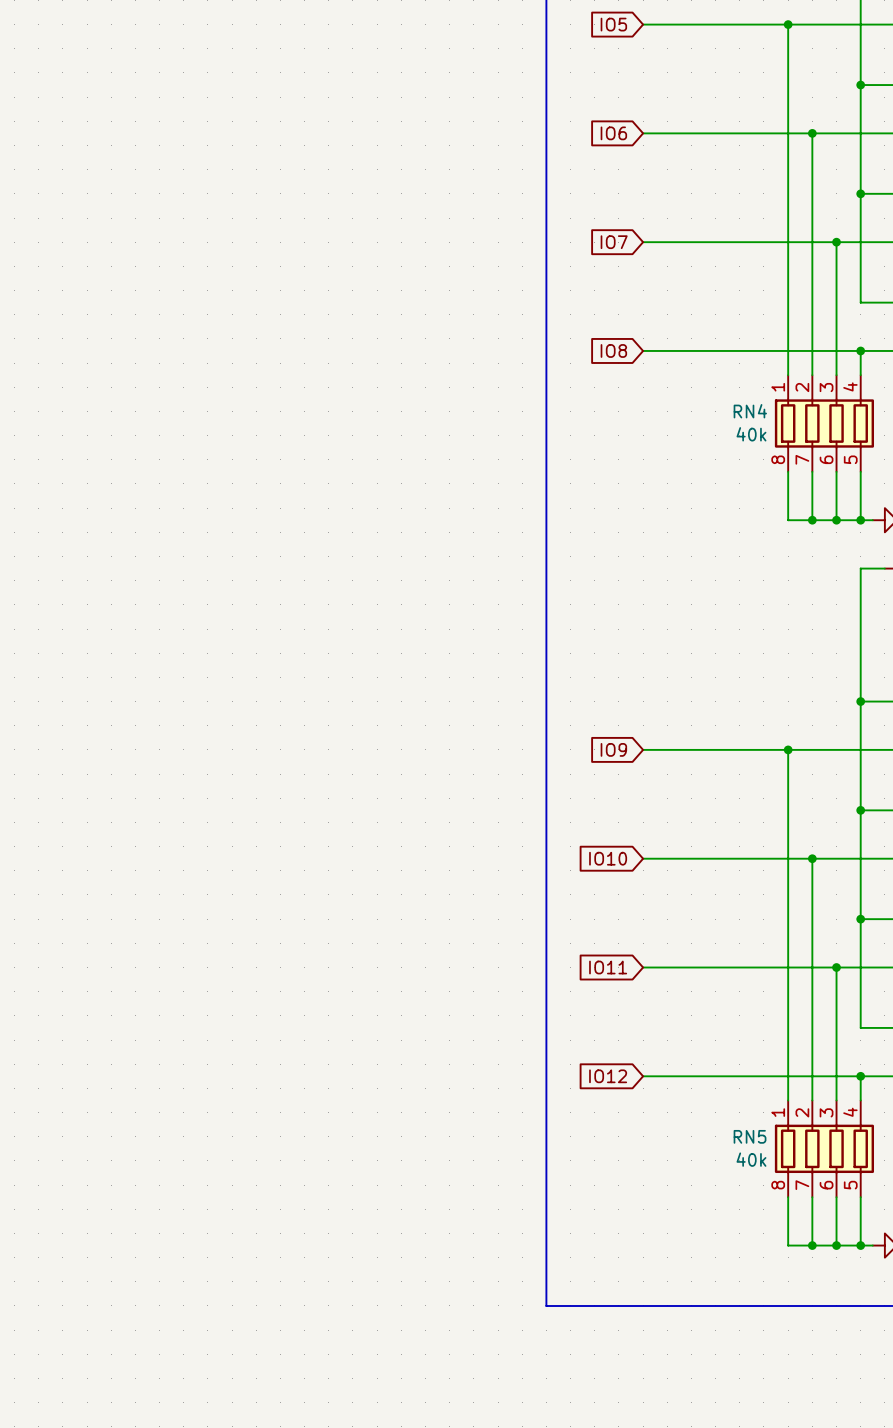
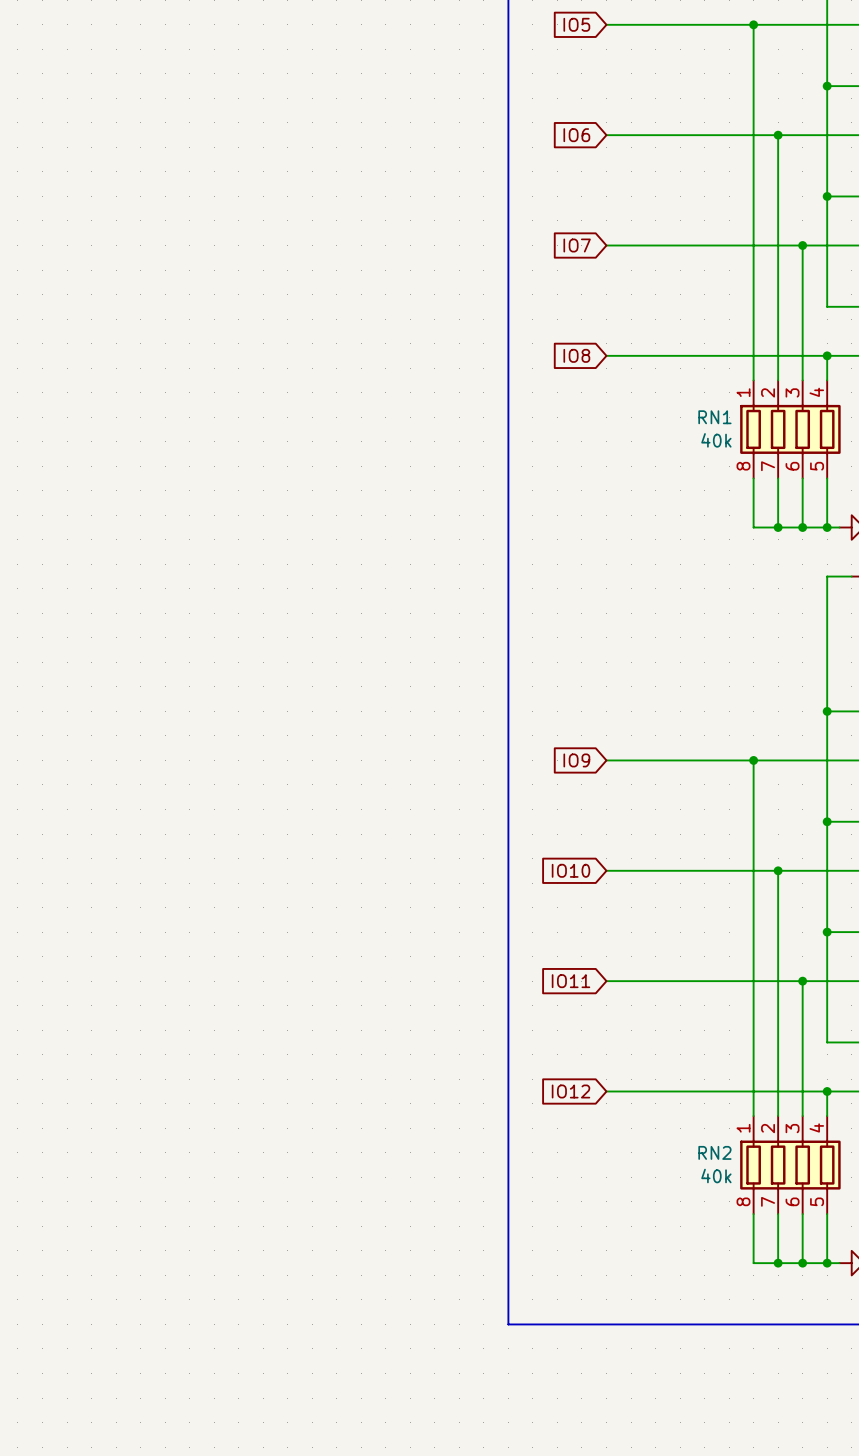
RN4 name: RN4 (750, 411) -> RN1 (714, 417)
RN5 name: RN5 (750, 1136) -> RN2 (714, 1152)

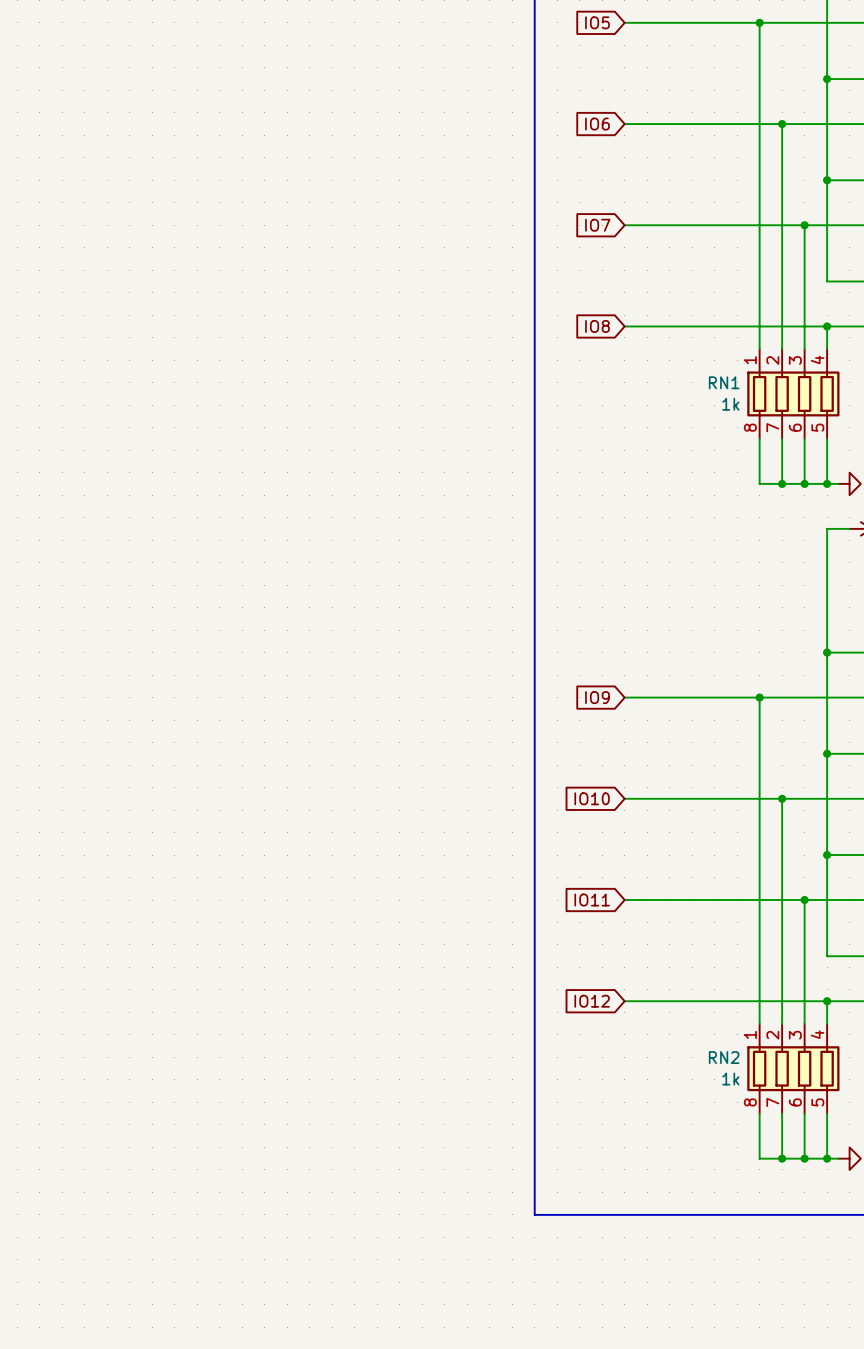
RN1 value: 40k (716, 440) -> 1k (730, 404)
RN2 value: 40k (716, 1176) -> 1k (730, 1079)

